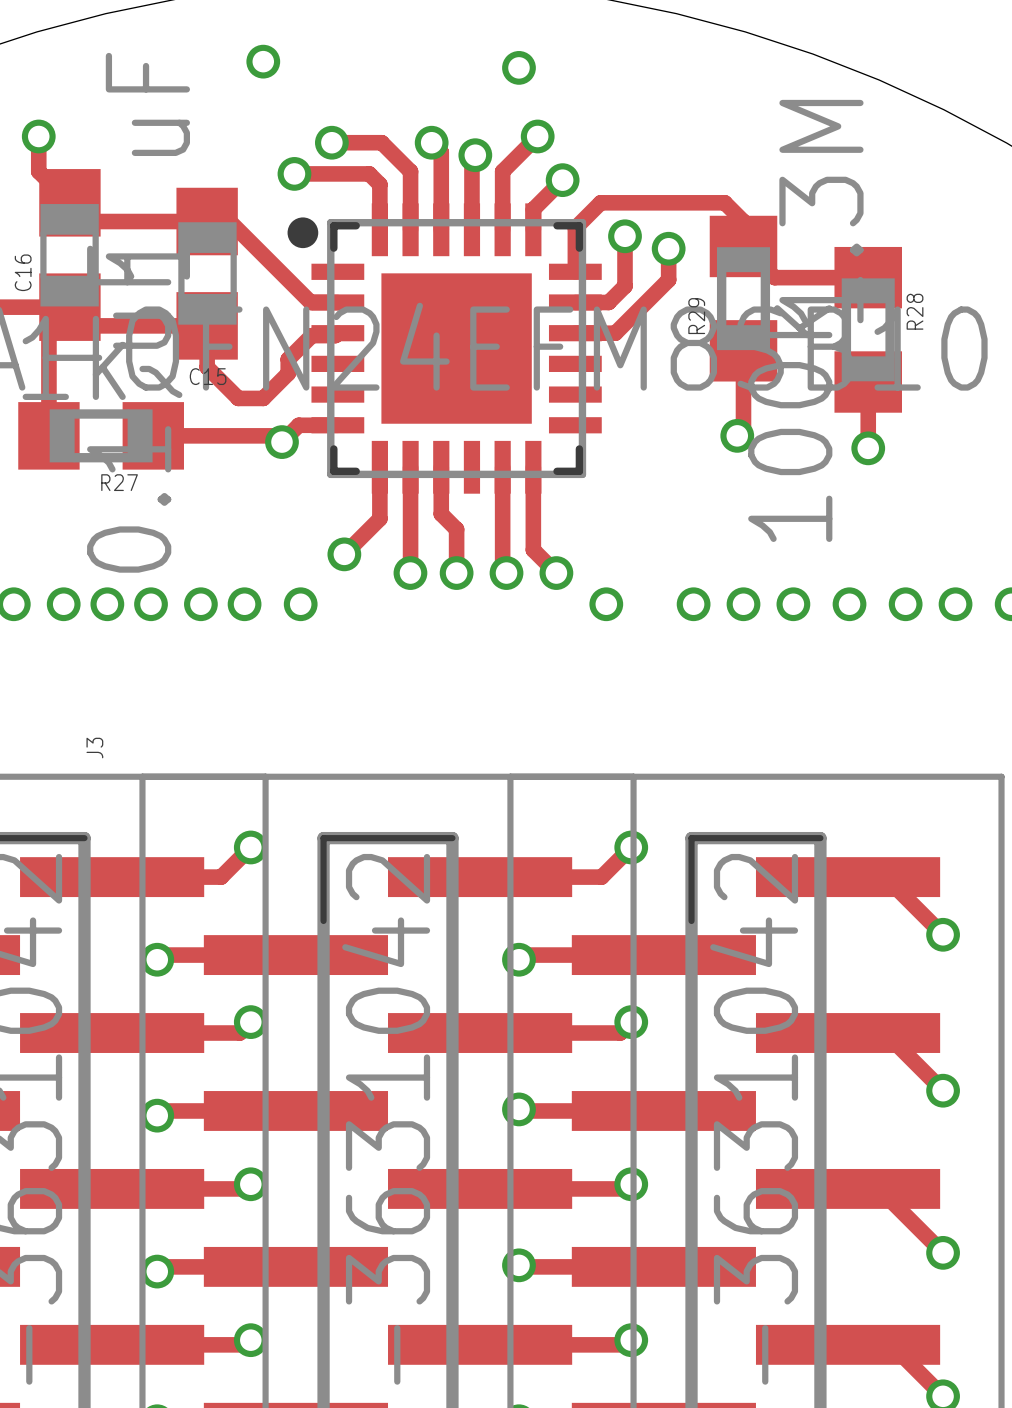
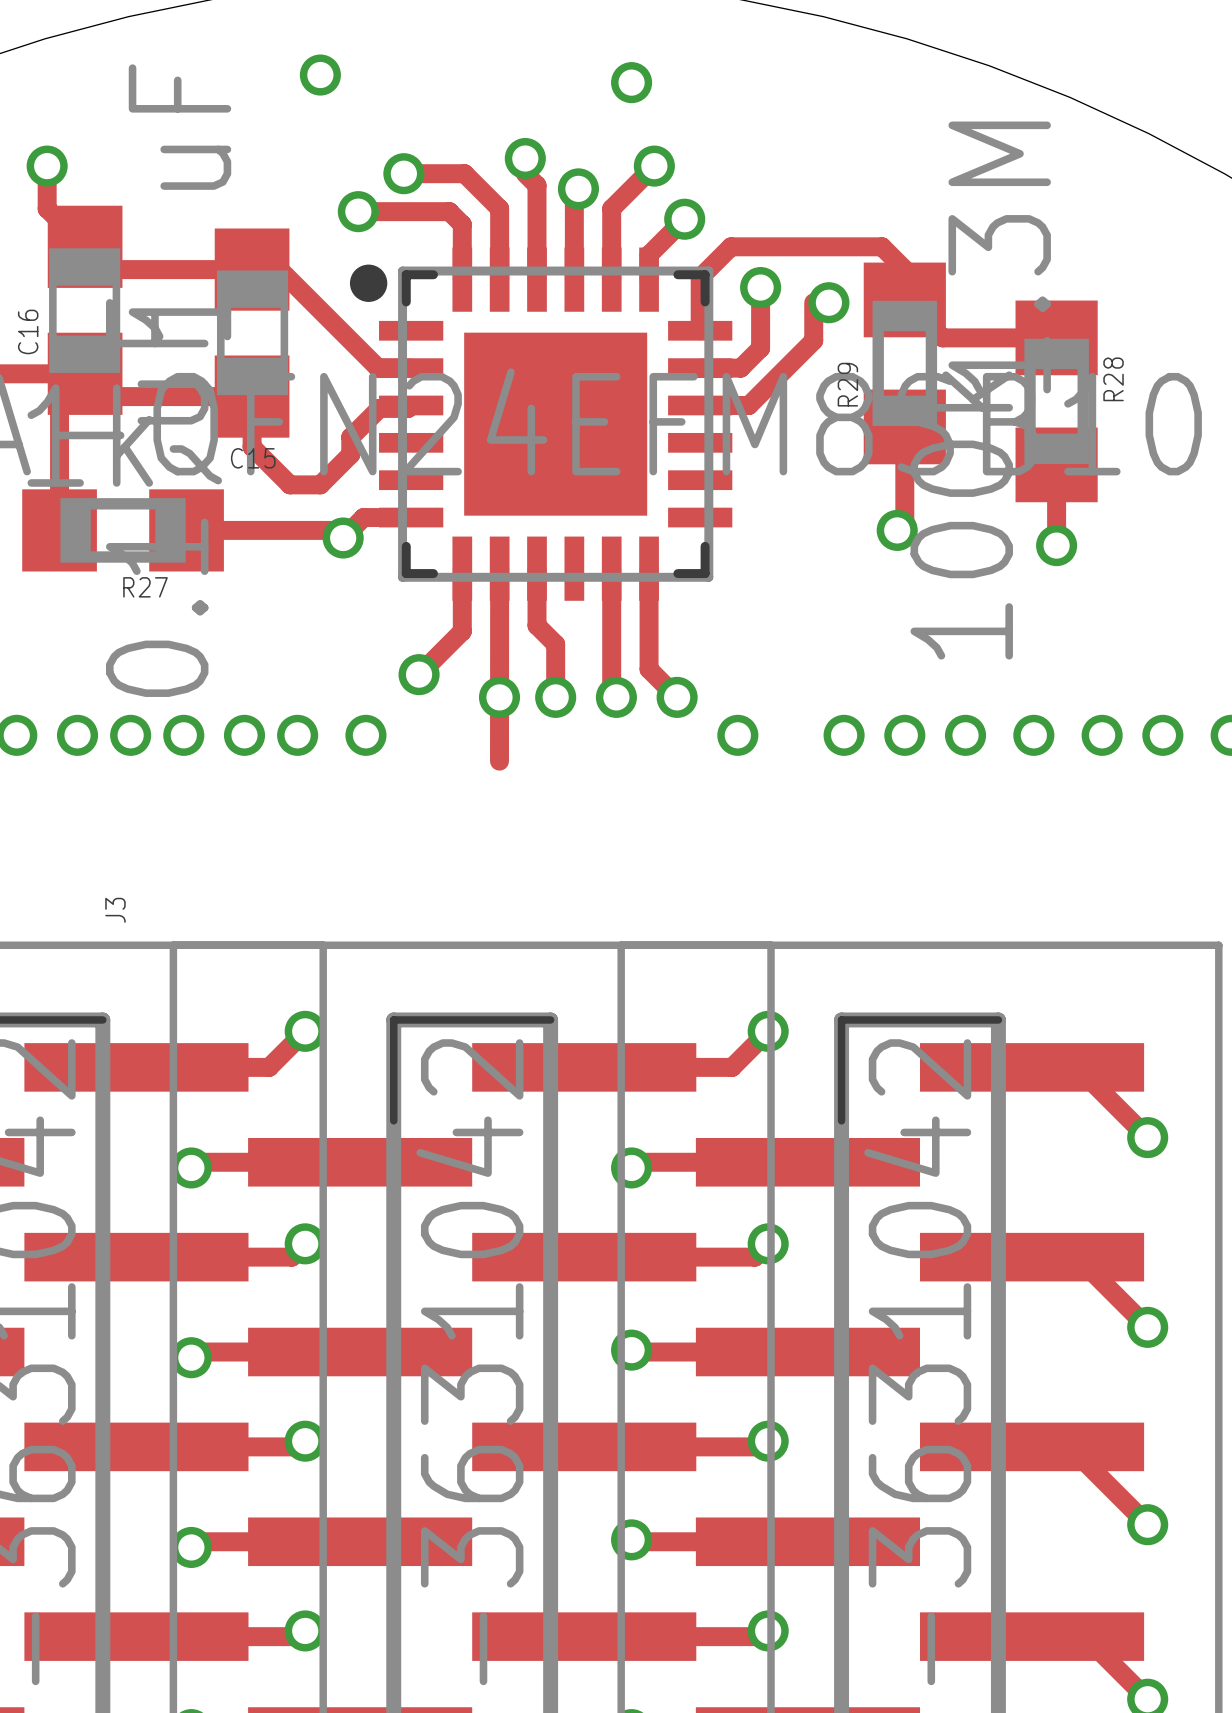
via position: (431, 142) -> (525, 158)
via position: (668, 248) -> (828, 302)
track: (410, 467) (410, 572) -> (499, 568) (499, 761)

